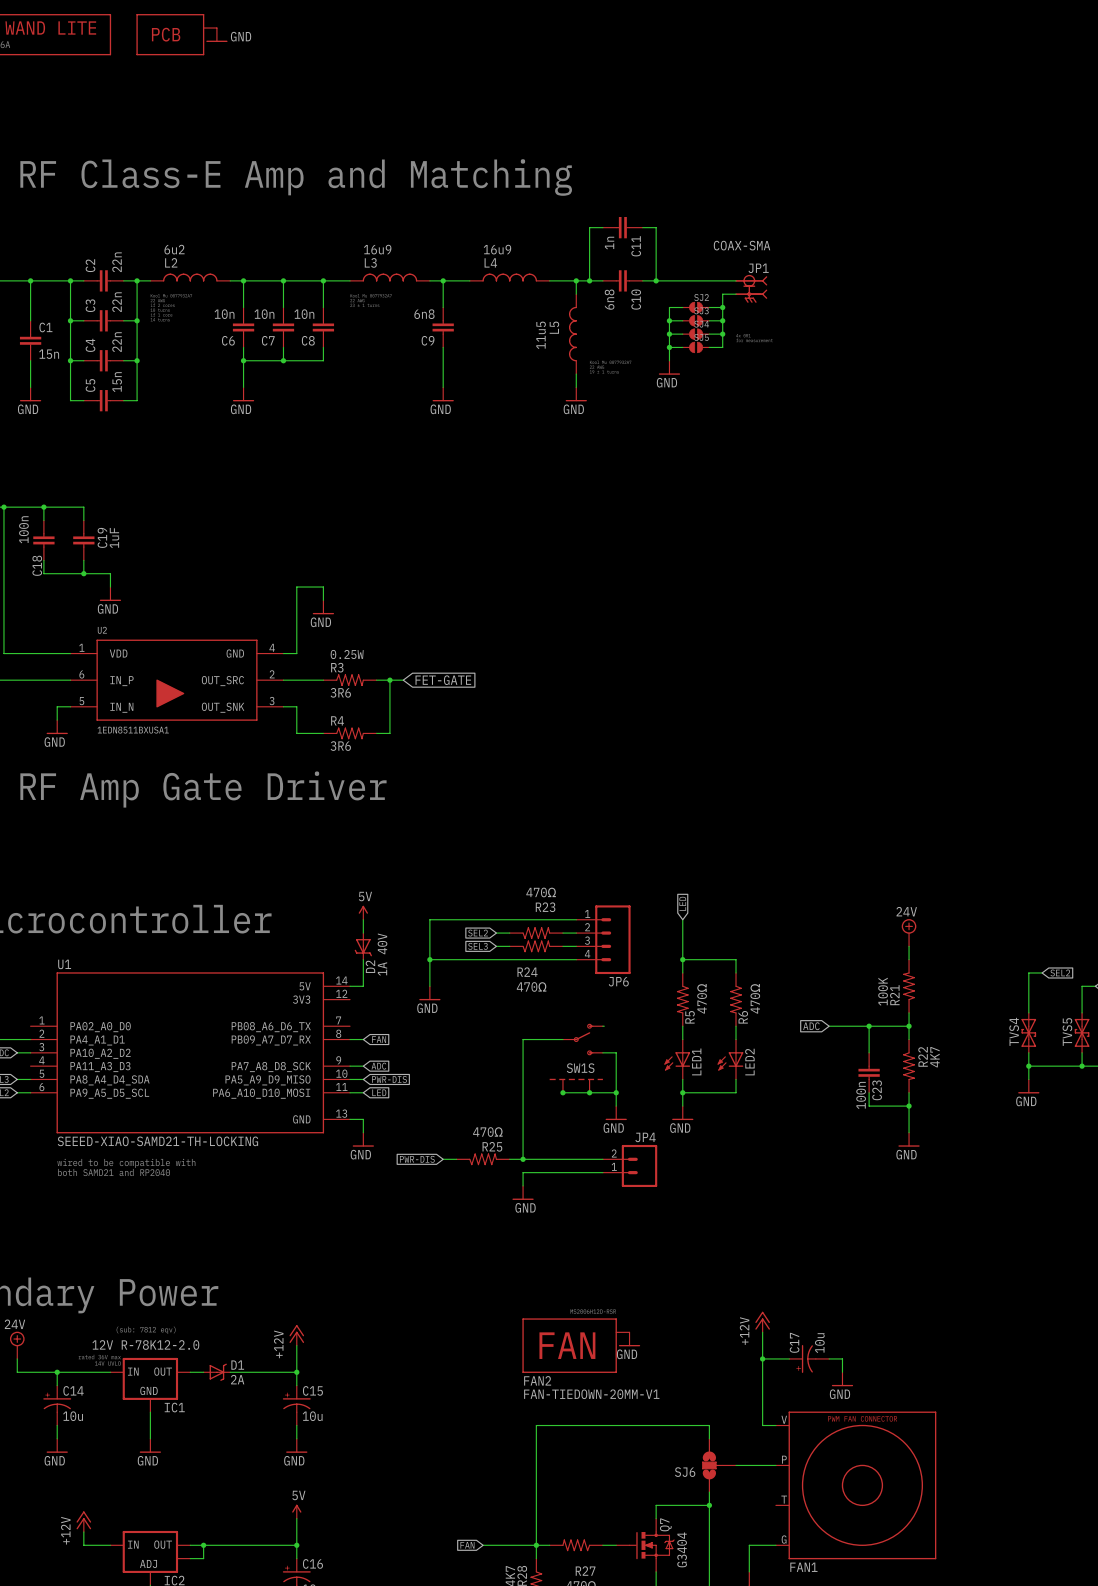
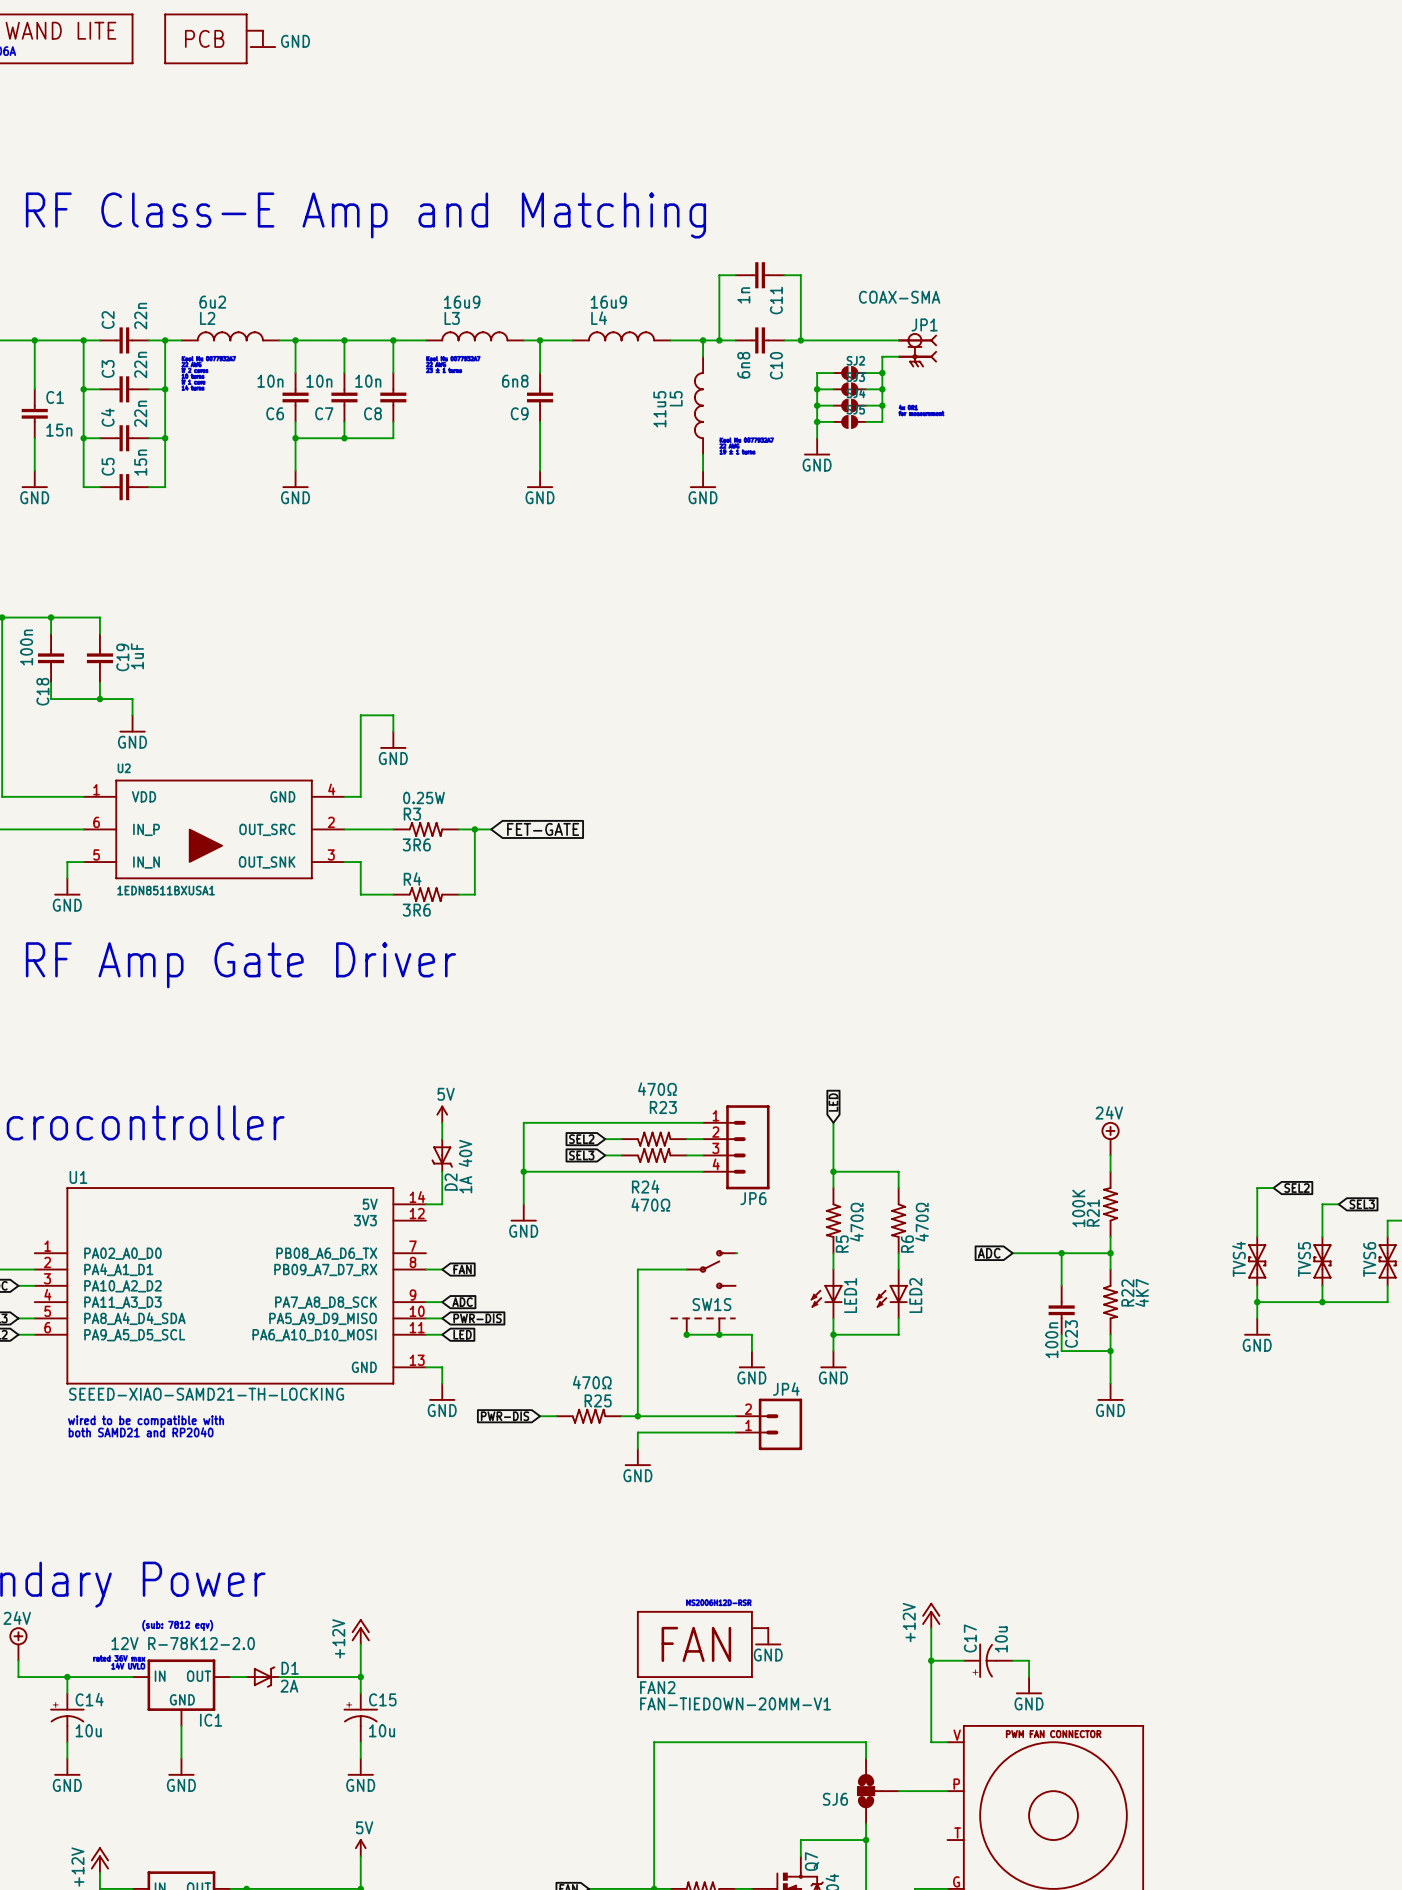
wire: (602, 1052) (616, 1052) (616, 1092) -> none
junction: (616, 1092) -> none

